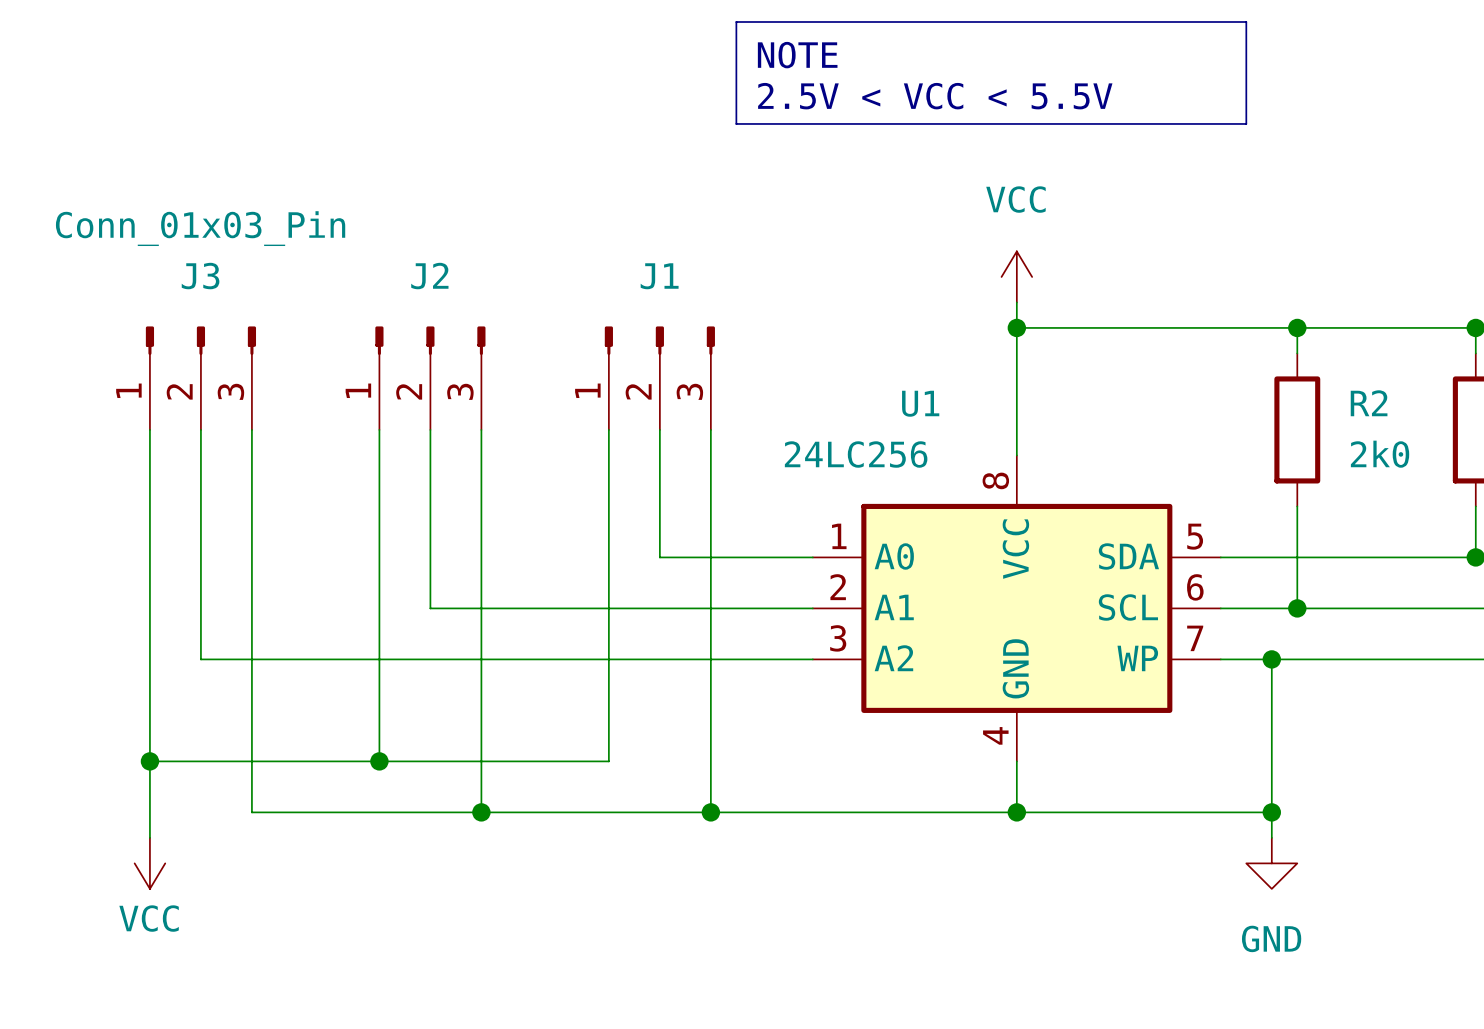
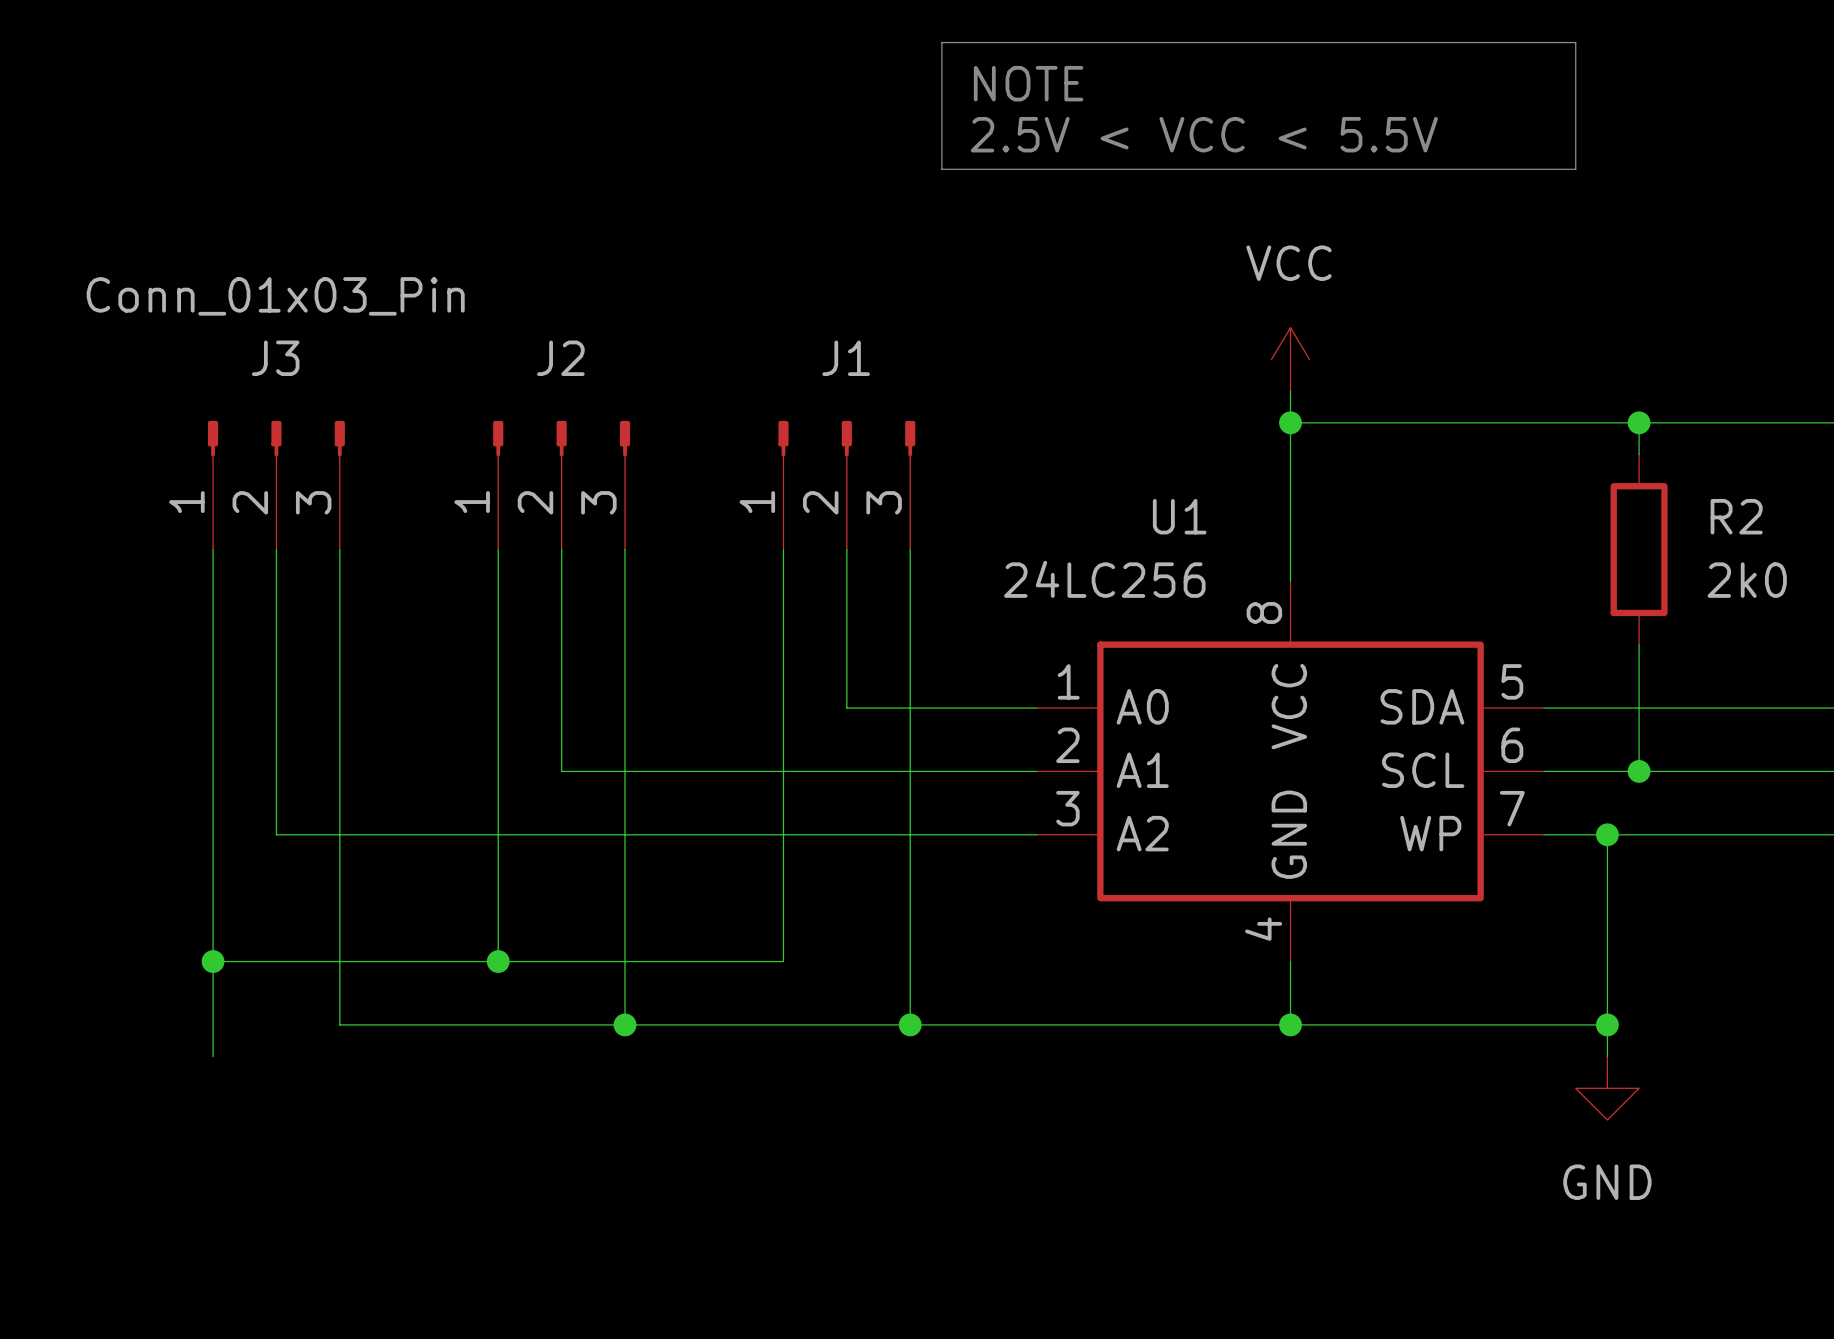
power symbol: VCC (149, 863) -> none

